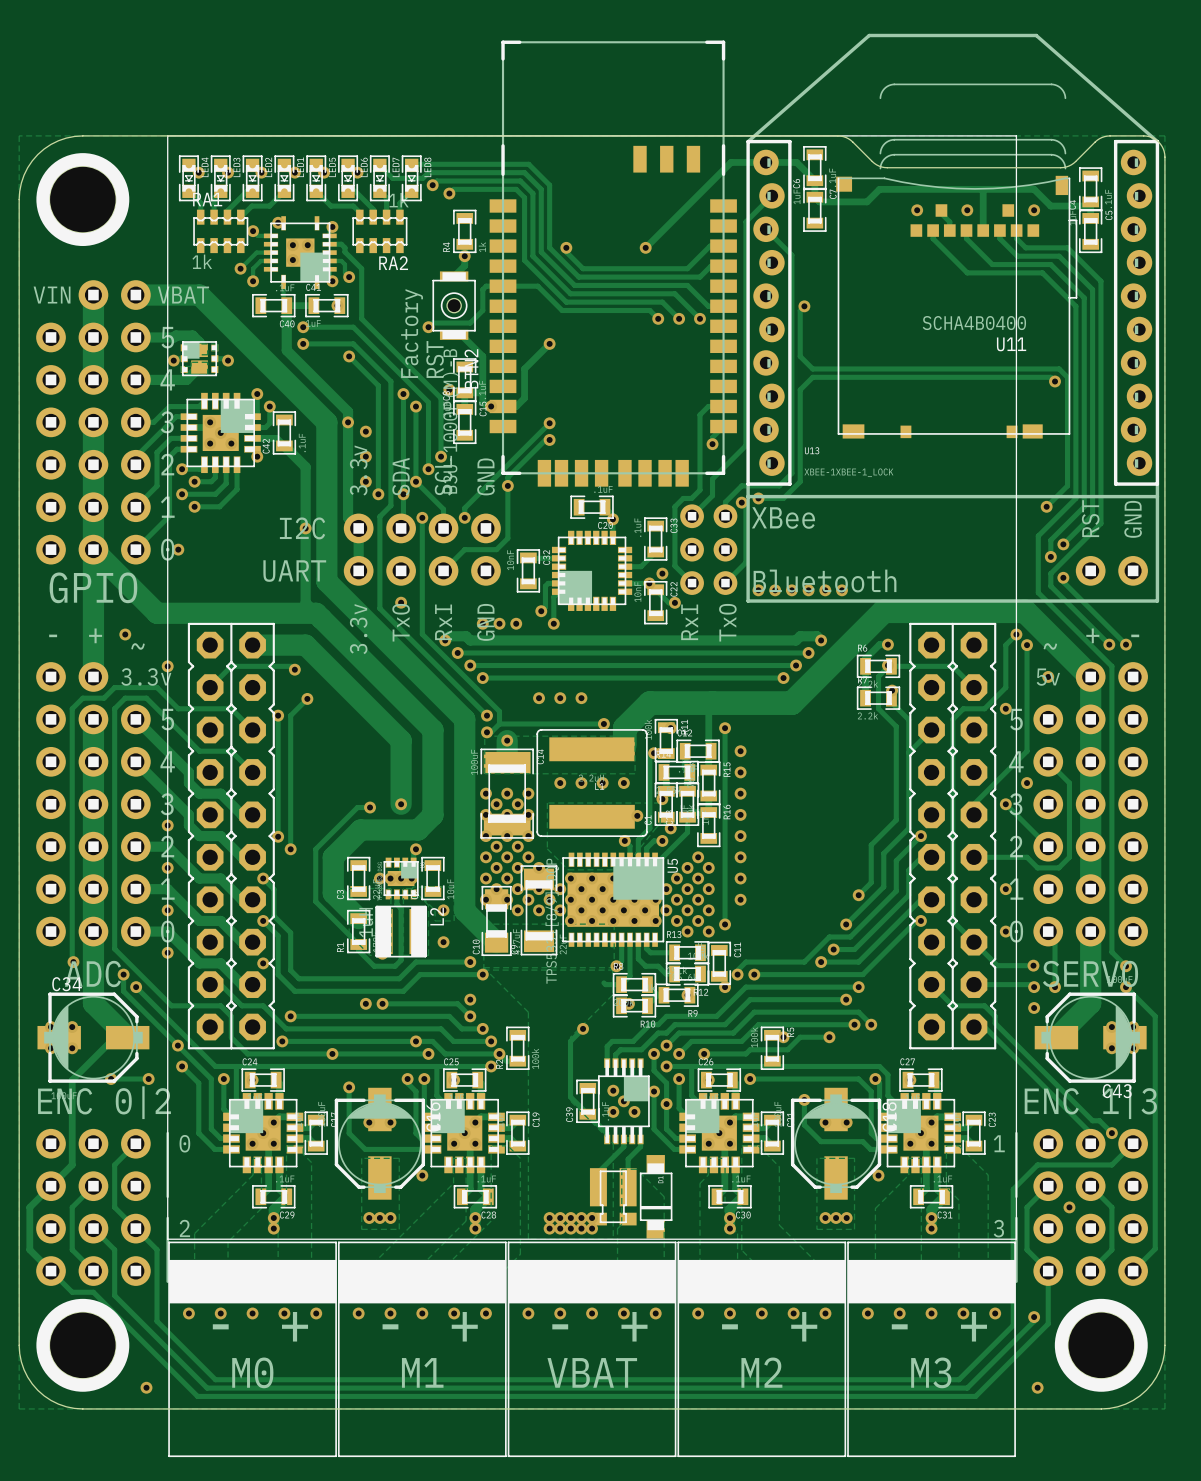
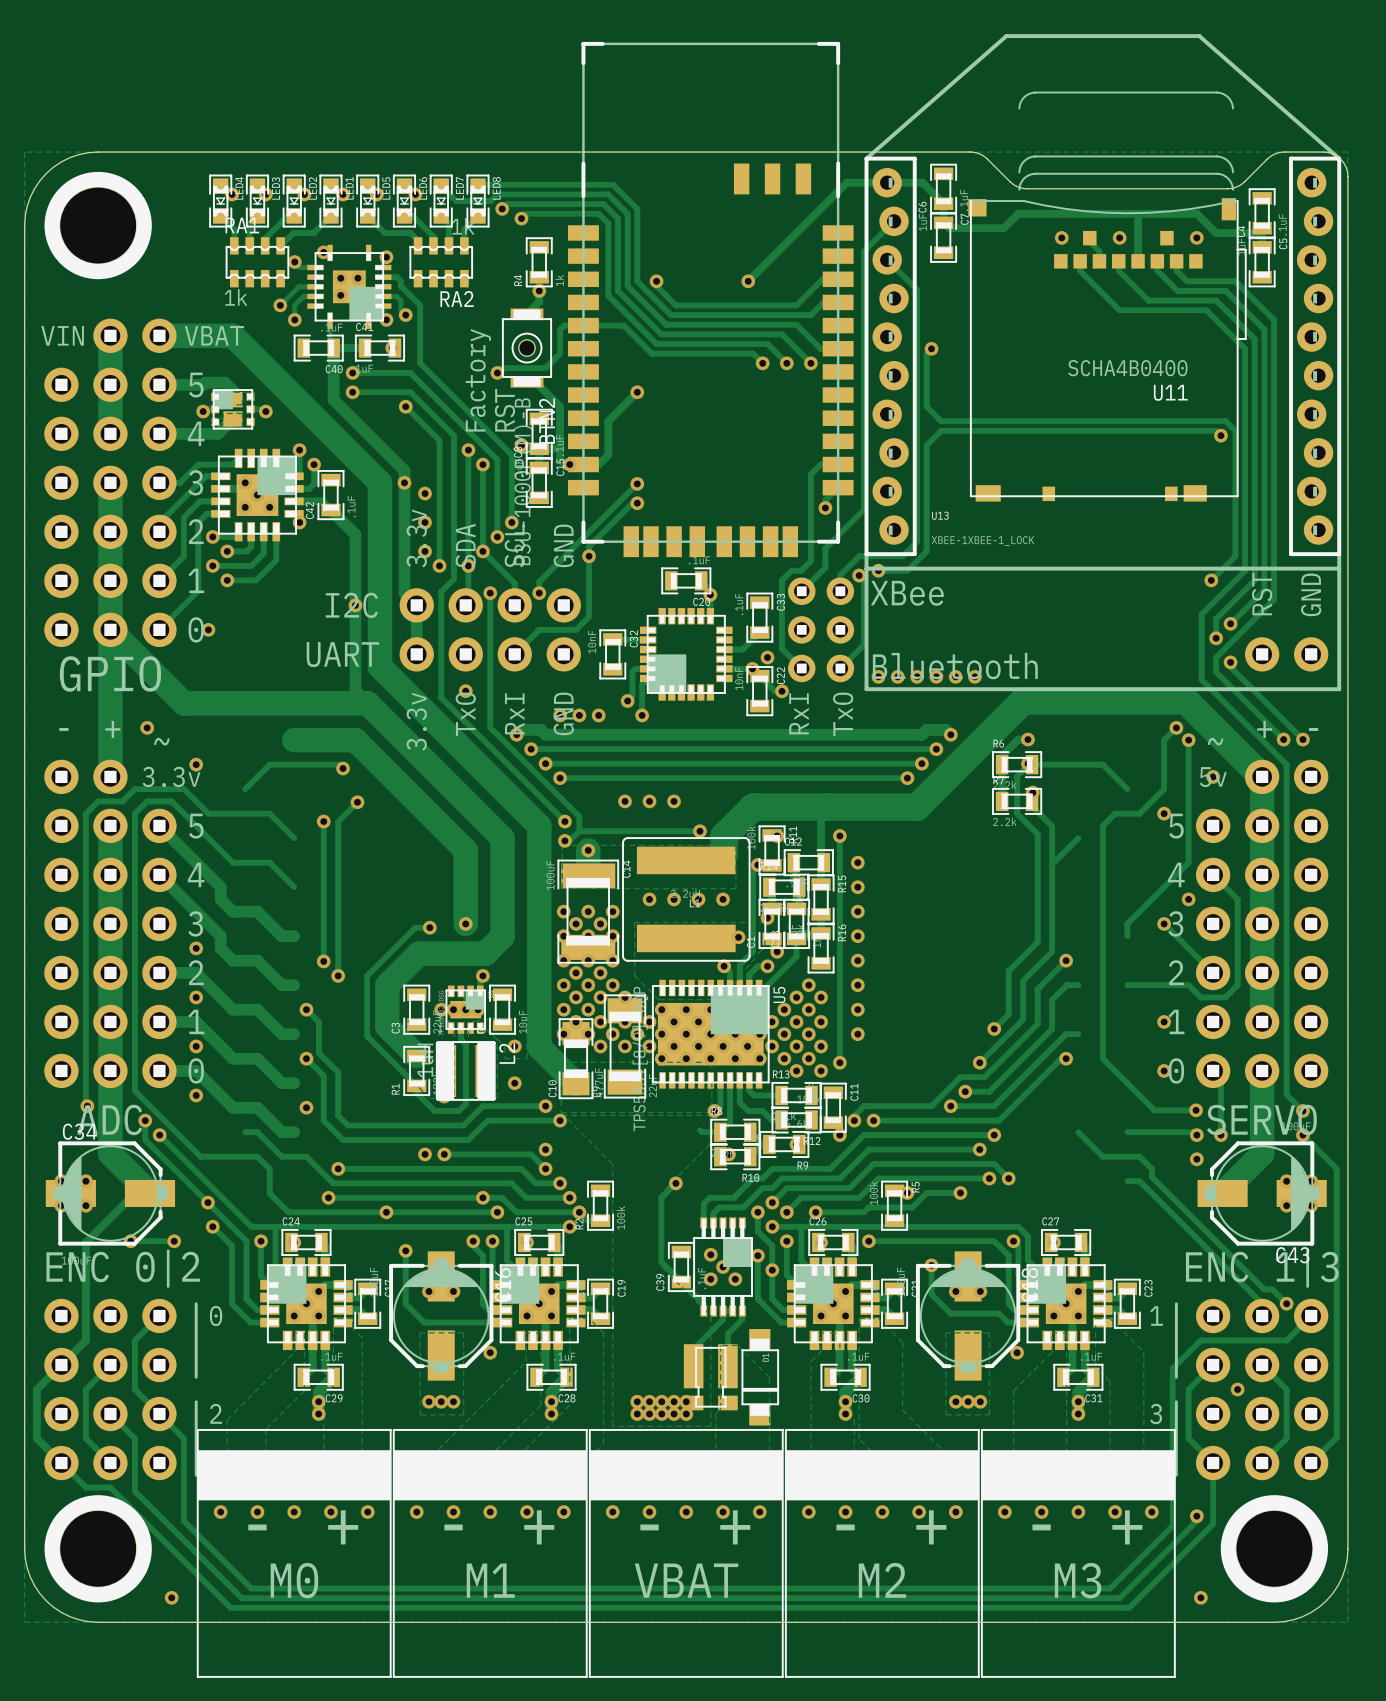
part: (592, 687) -> none

